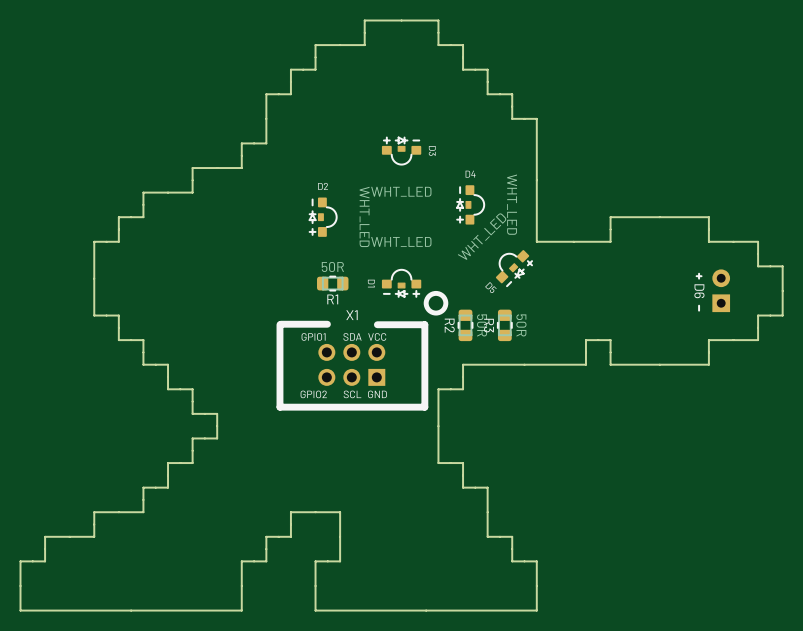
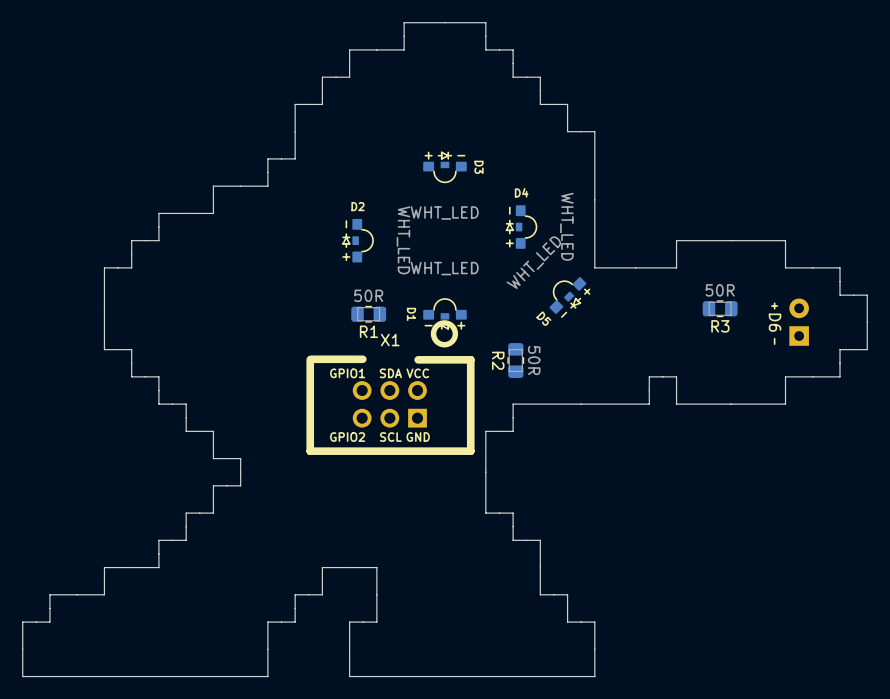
drawing: [423, 290, 449, 316] -> none
X1 footprint: [276, 320, 429, 411] -> [306, 320, 475, 455]
R3 name position: R3 (488, 325) -> R3 (720, 326)
R3 rotation: 0° (504, 325) -> 90° clockwise (720, 308)
R3 position: (504, 325) -> (720, 308)
R3 value position: 50R (521, 325) -> 50R (720, 290)

